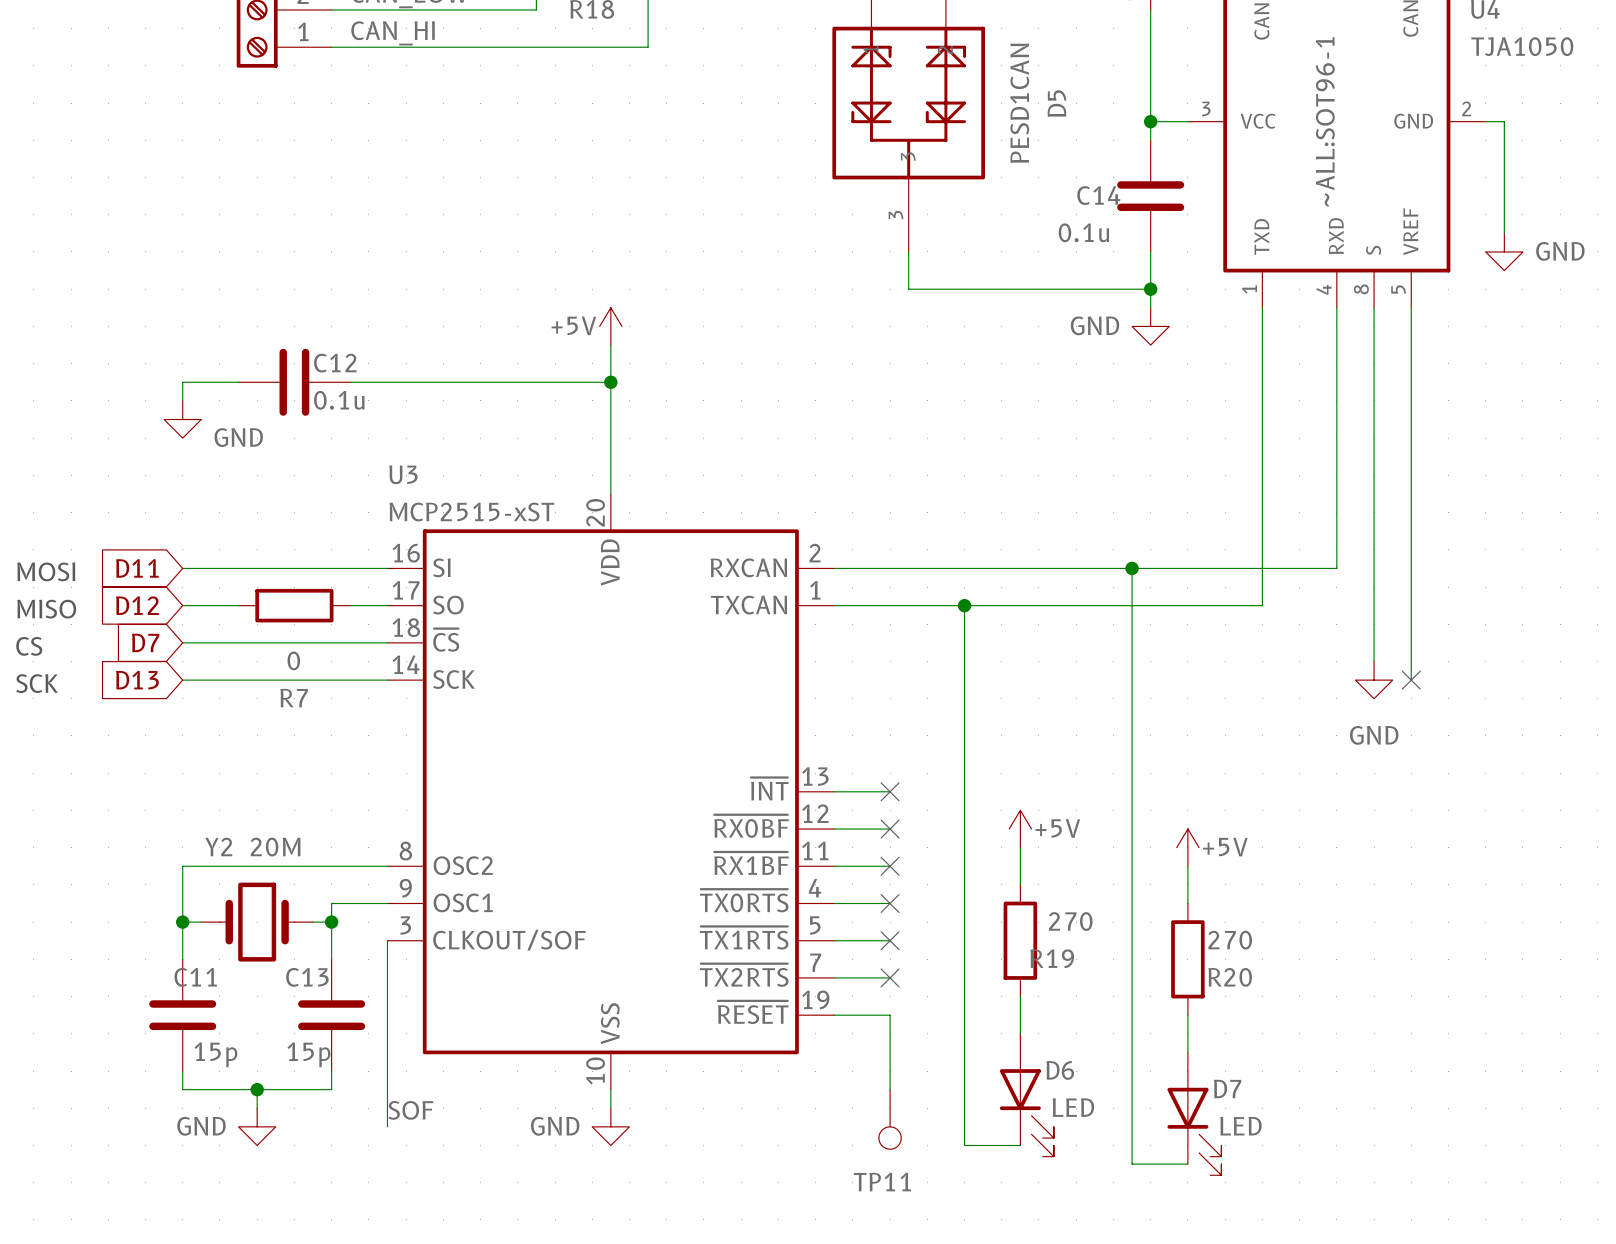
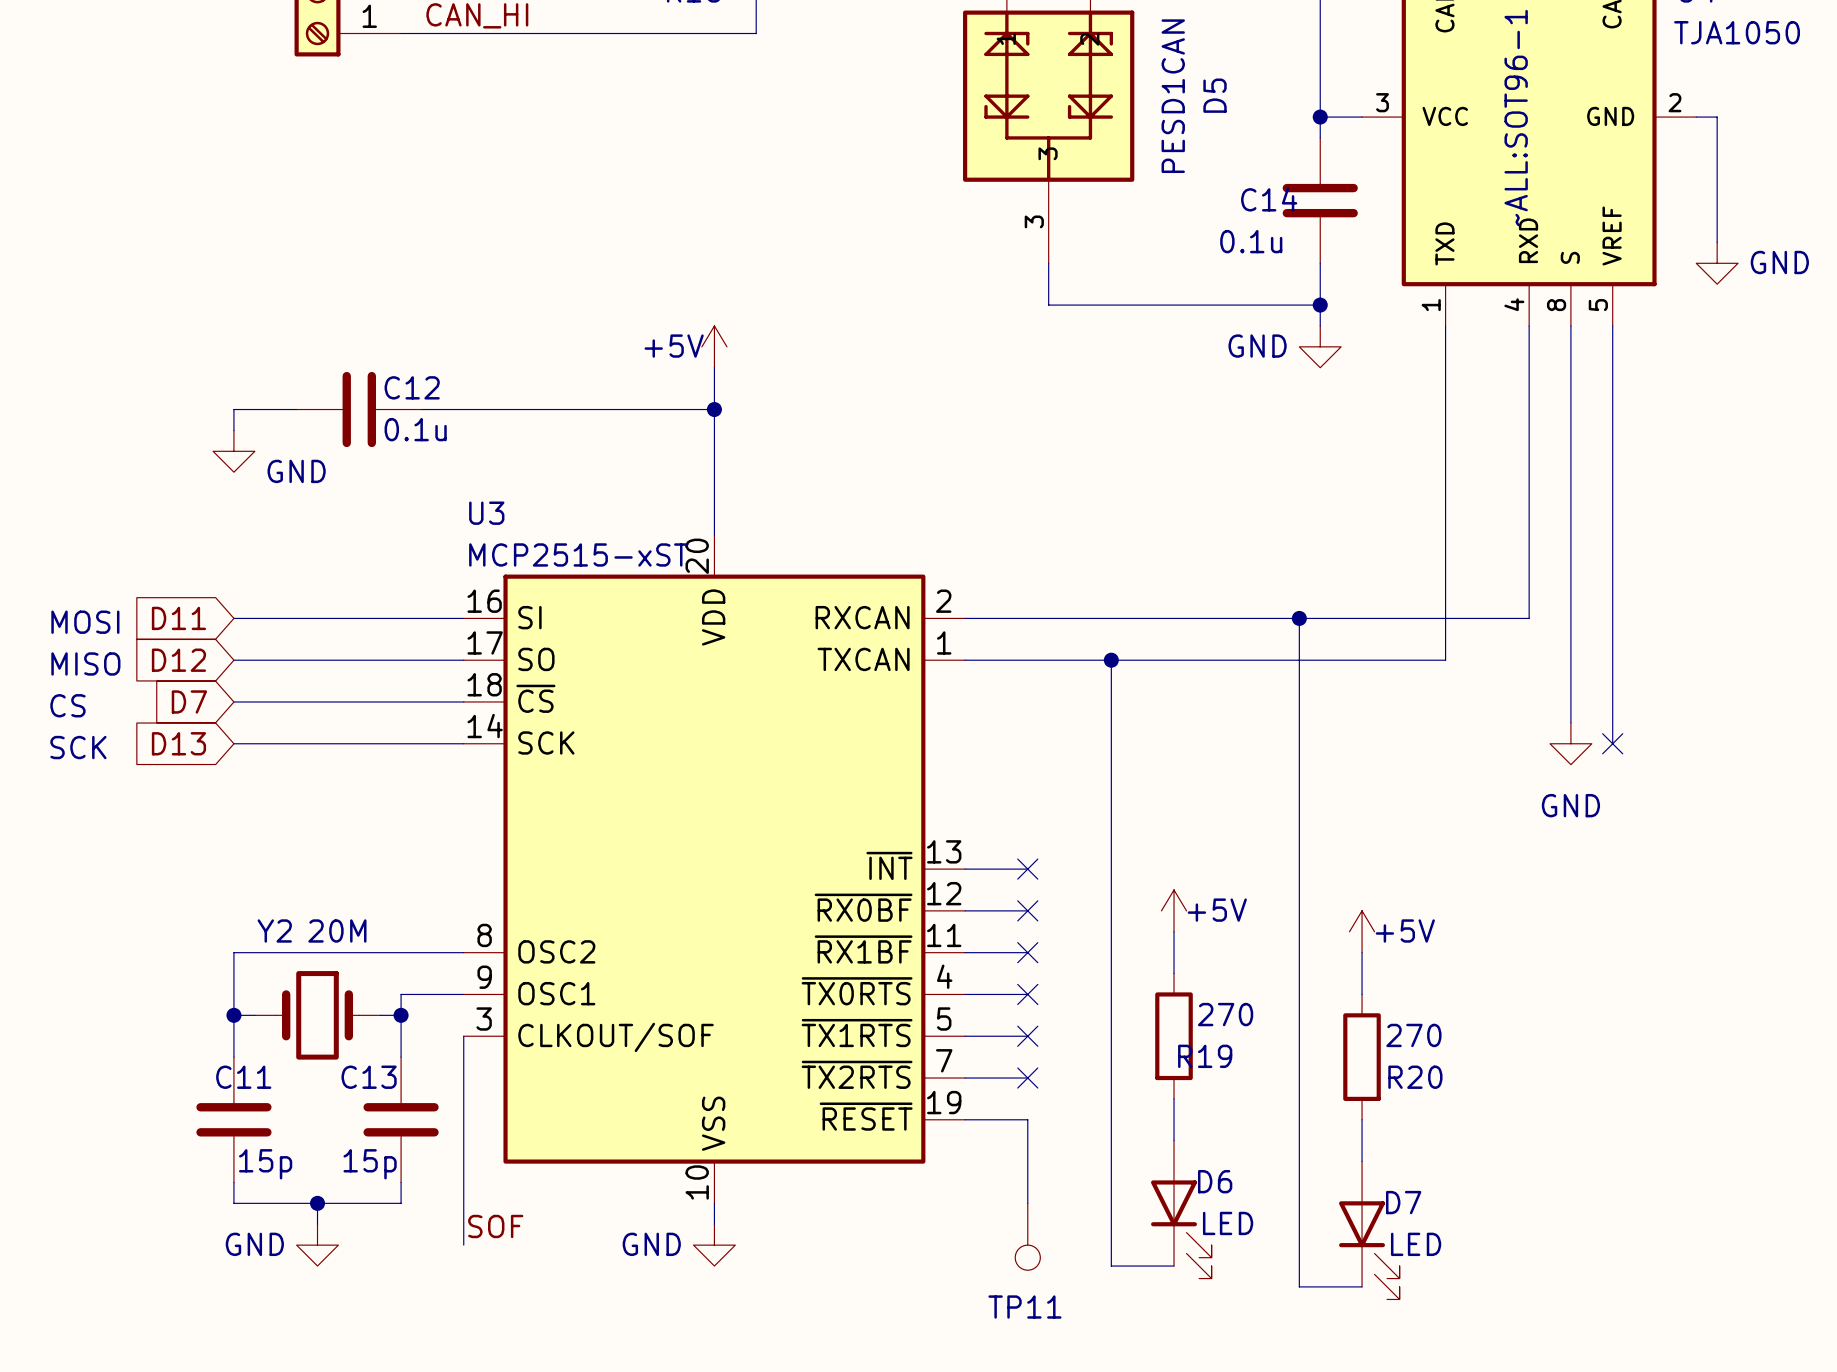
wire: none -> (296, 660) (421, 660)
R7: 0 (294, 605) -> none

